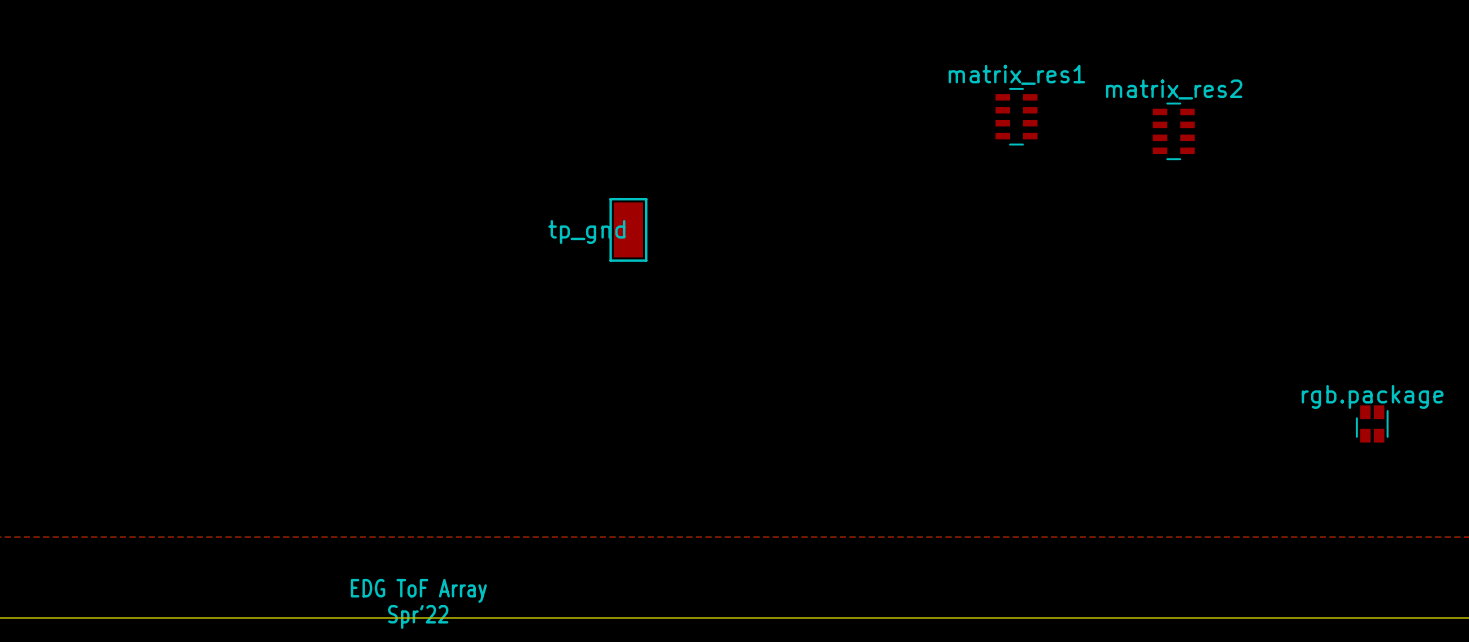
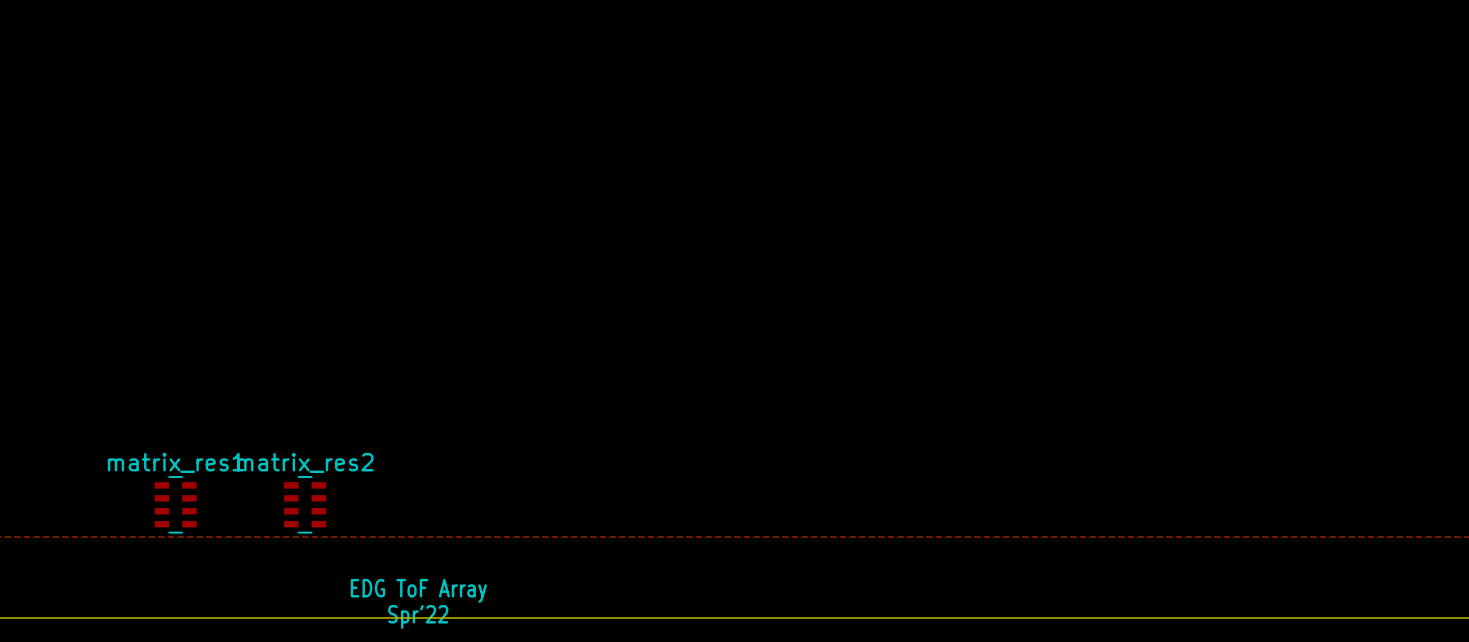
matrix_res1 position: (1016, 116) -> (175, 504)
matrix_res2 position: (1173, 131) -> (305, 504)
tp_gnd: (628, 229) -> none
rgb.package: (1372, 423) -> none

